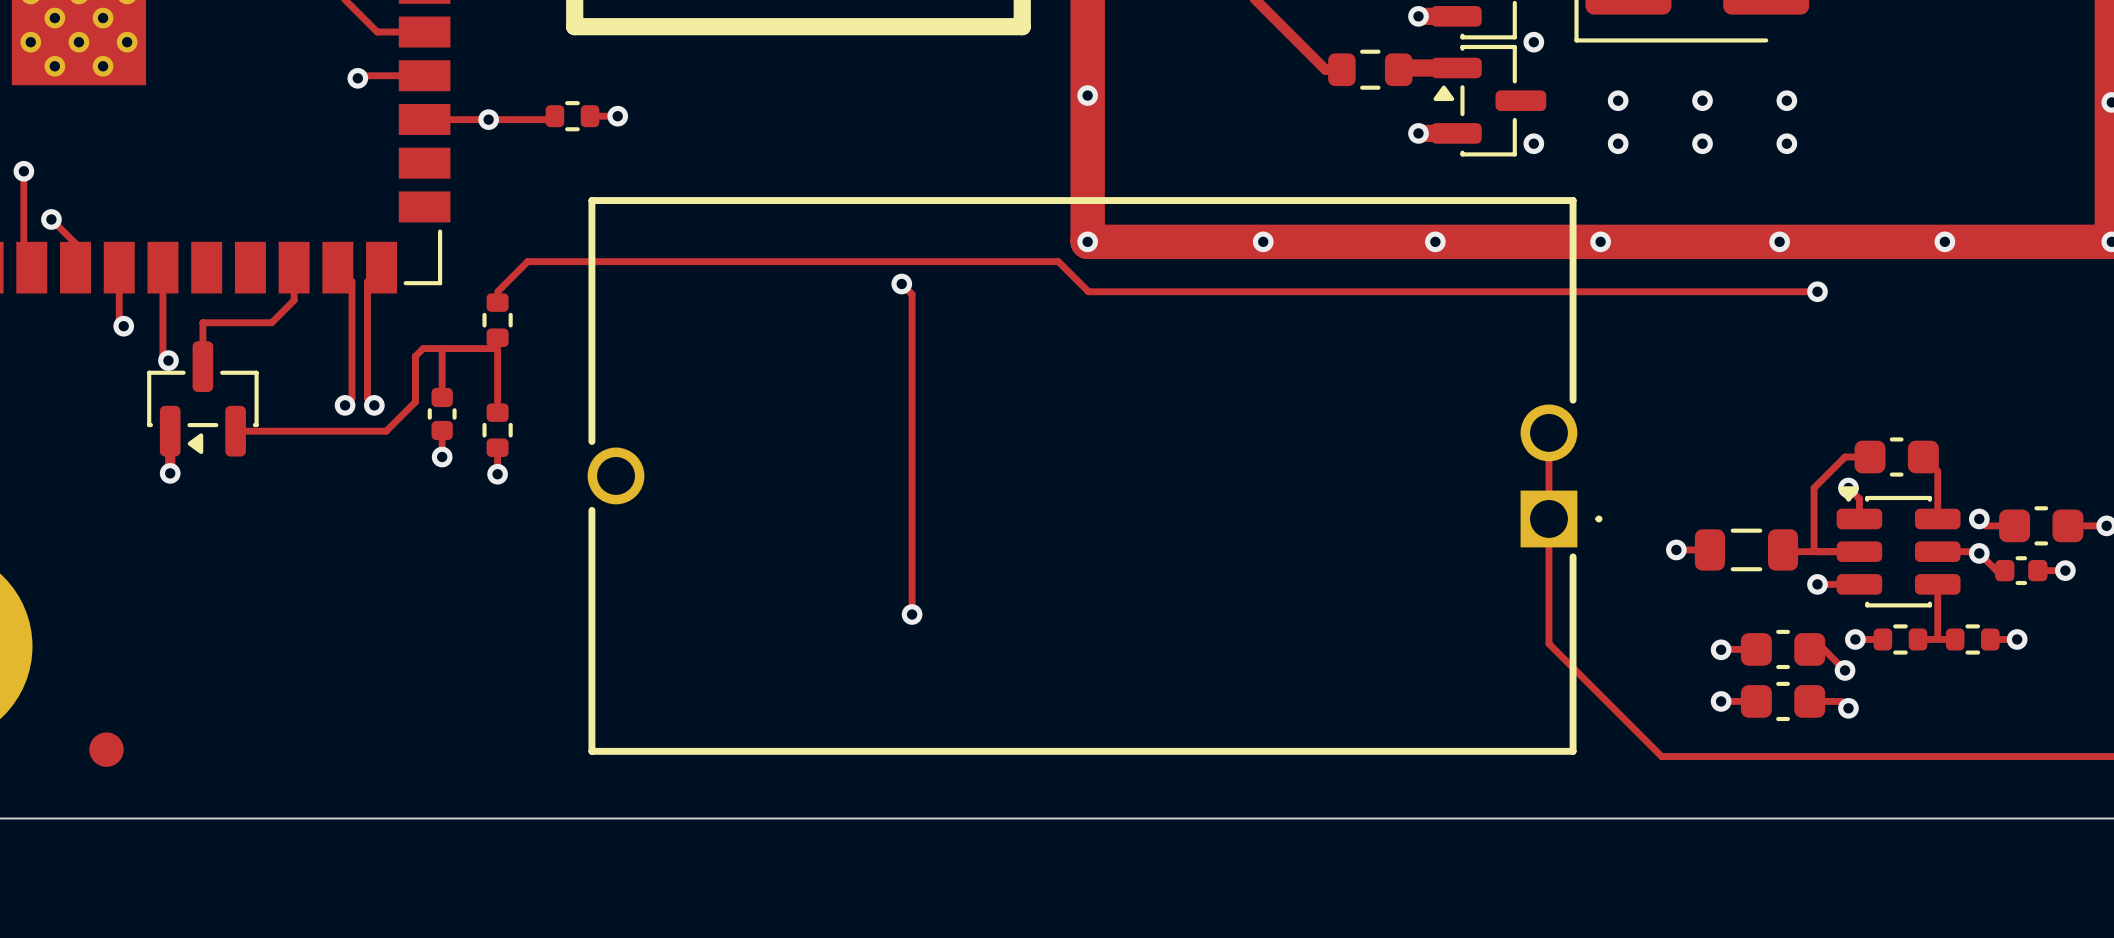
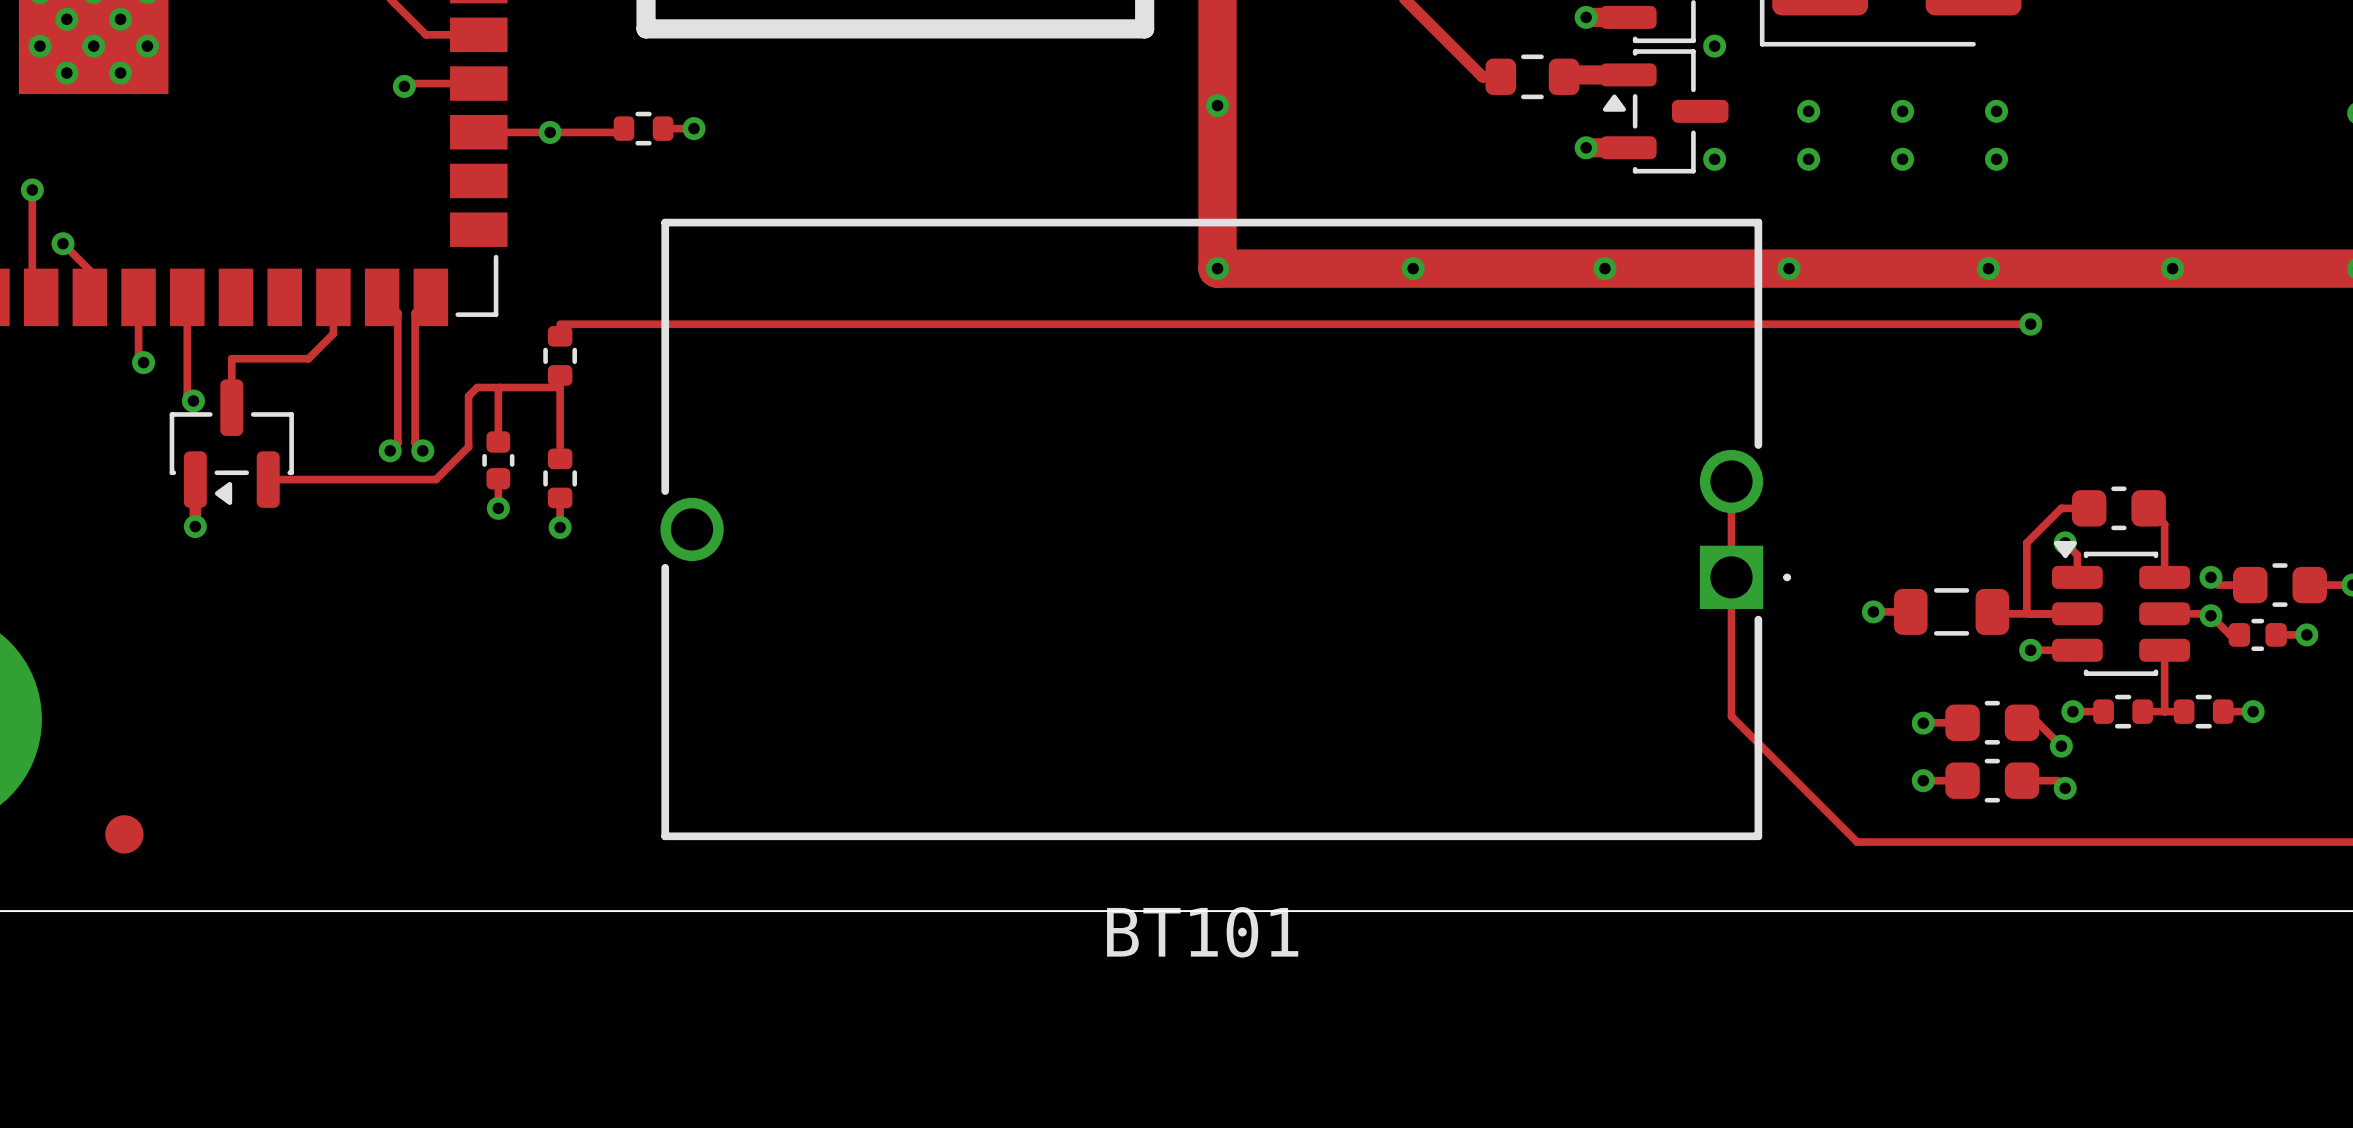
track: (901, 284) (912, 294) (912, 614) -> none
via: (901, 284) -> none
track: (497, 291) (527, 261) (1058, 261) (1088, 291) -> (560, 324) (1218, 324)
via: (912, 614) -> none
BT101 name: none -> BT101 (1202, 932)

